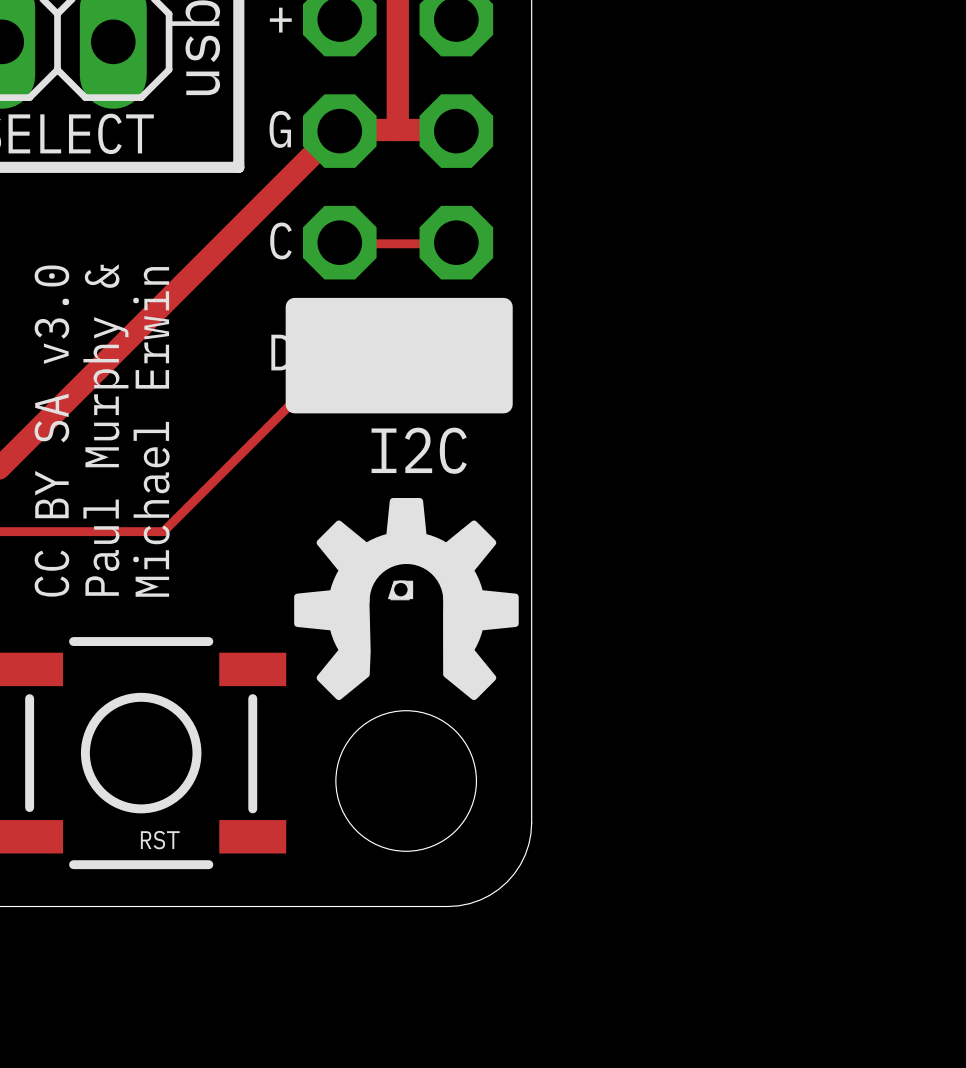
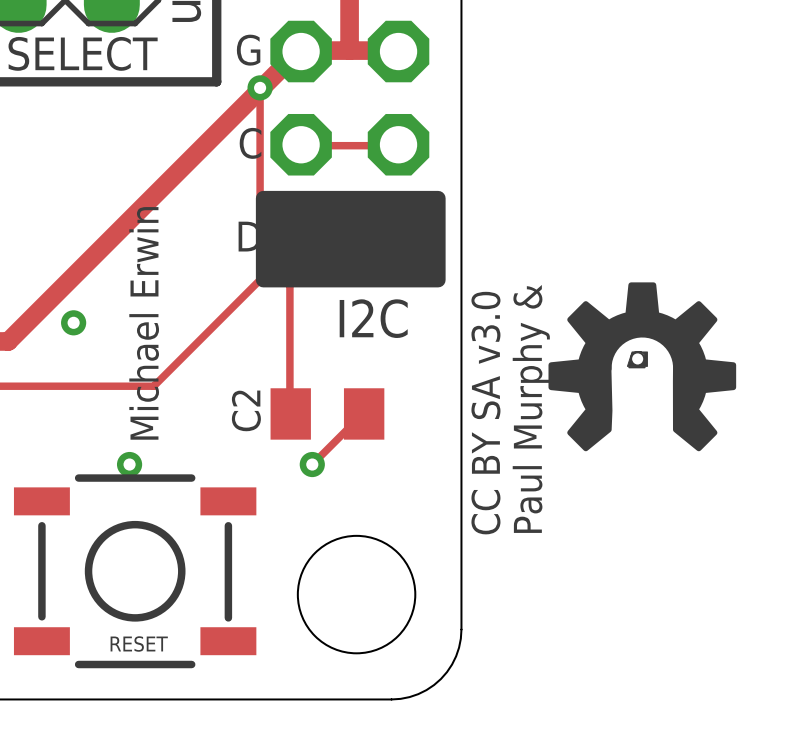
track: none -> (260, 87) (260, 255) (289, 285) (290, 413)
via: none -> (260, 87)
text position: Paul Murphy & (105, 430) -> Paul Murphy & (531, 408)
text position: CC BY SA v3.0 (51, 431) -> CC BY SA v3.0 (485, 413)
via: none -> (73, 322)
C2: none -> (327, 413)
track: none -> (364, 413) (312, 464)
drawing position: (406, 599) -> (642, 366)
via: none -> (129, 464)
via: none -> (312, 464)
RST name: RST (160, 840) -> RESET (139, 644)

